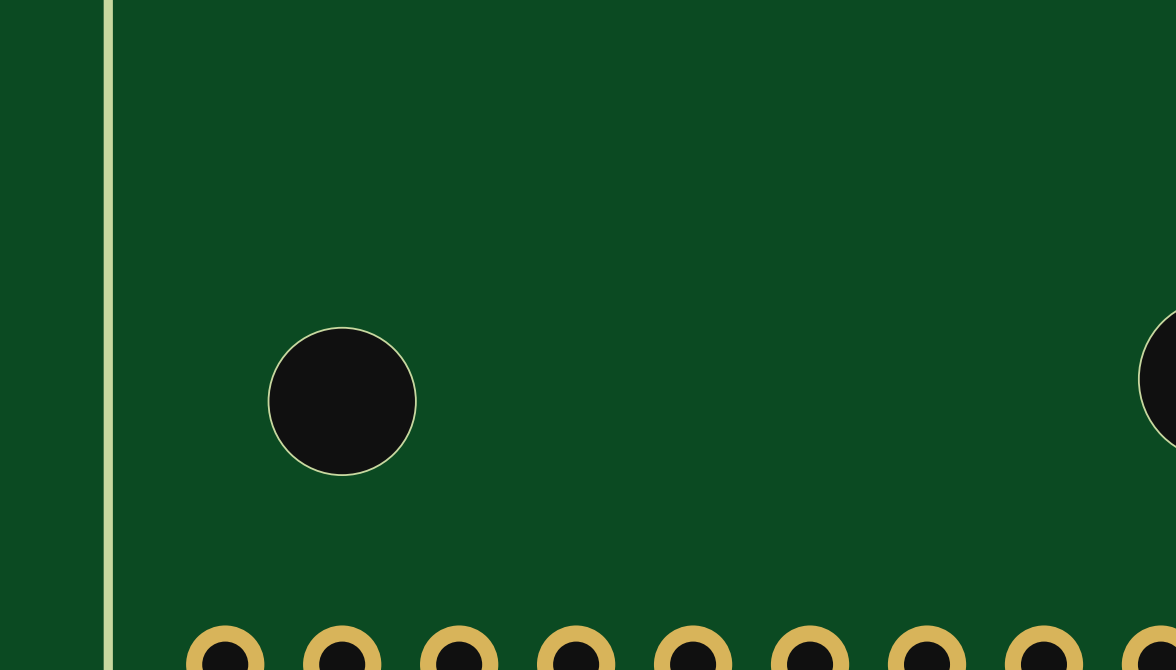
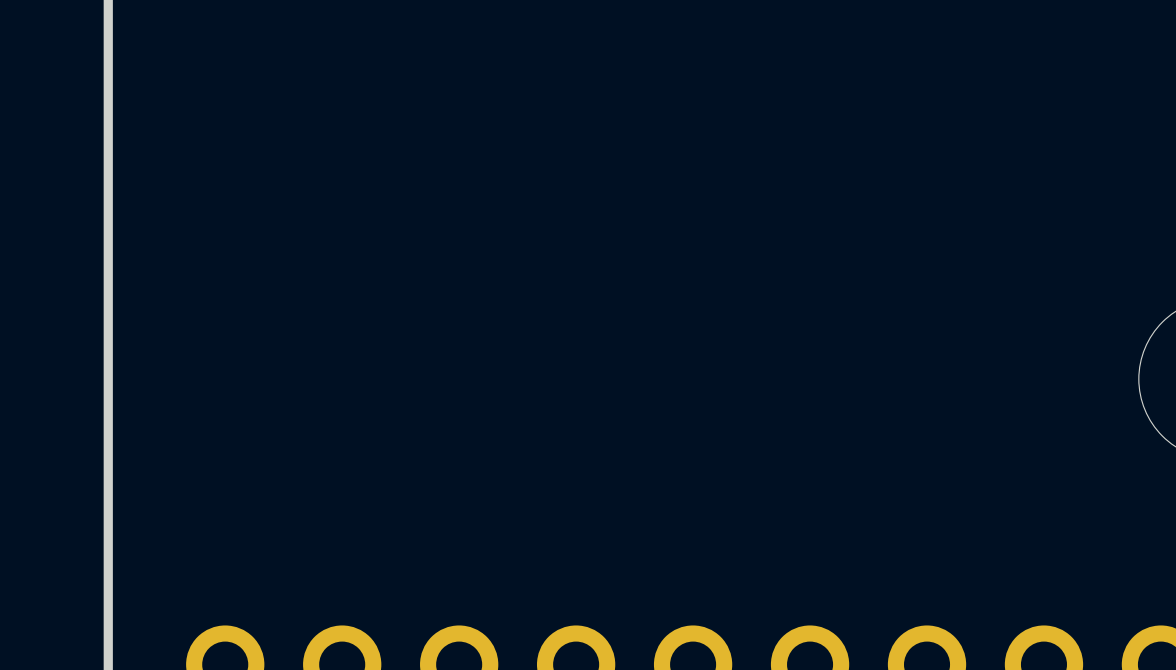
part: (342, 401) -> none

